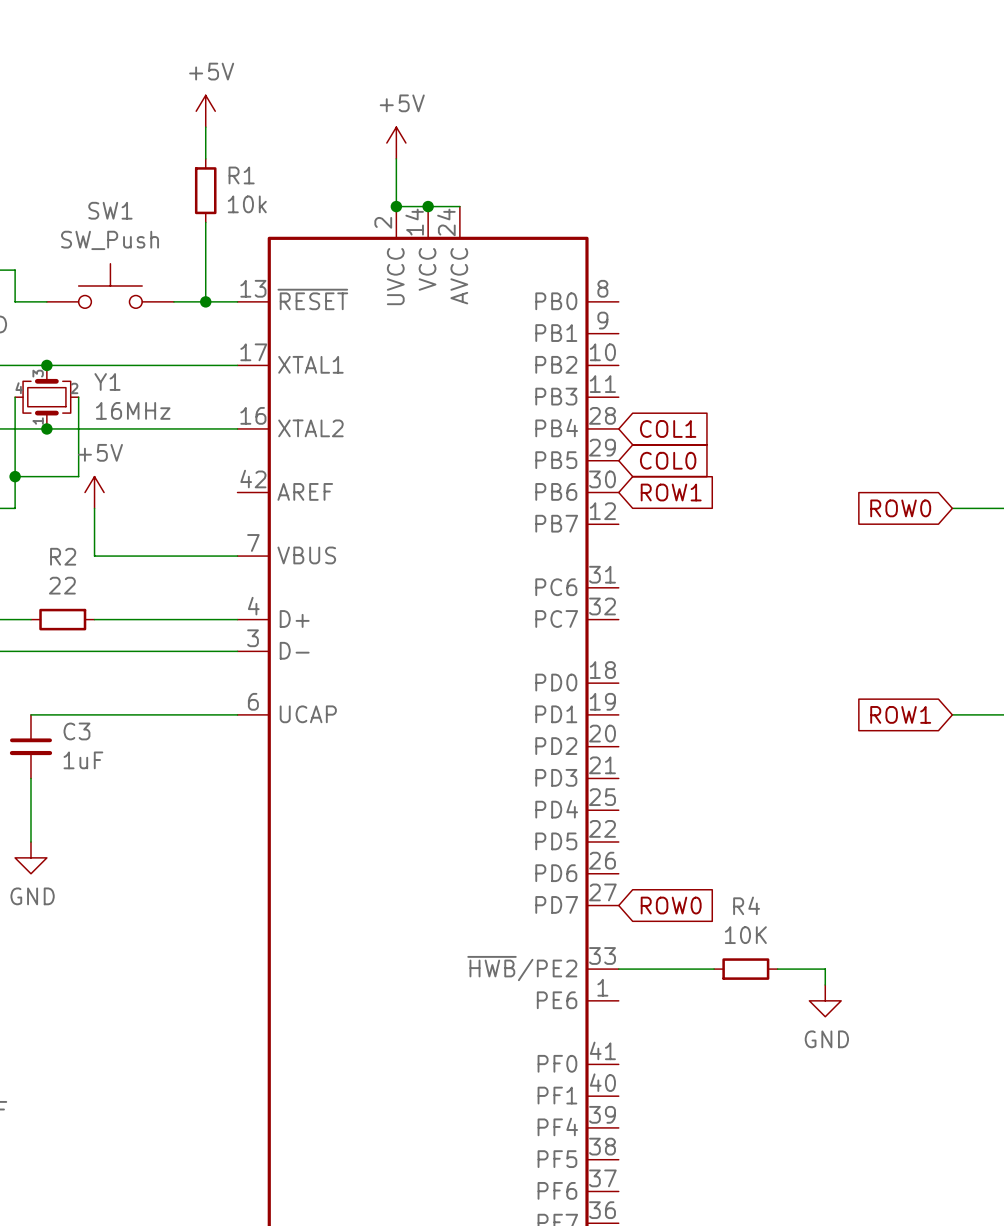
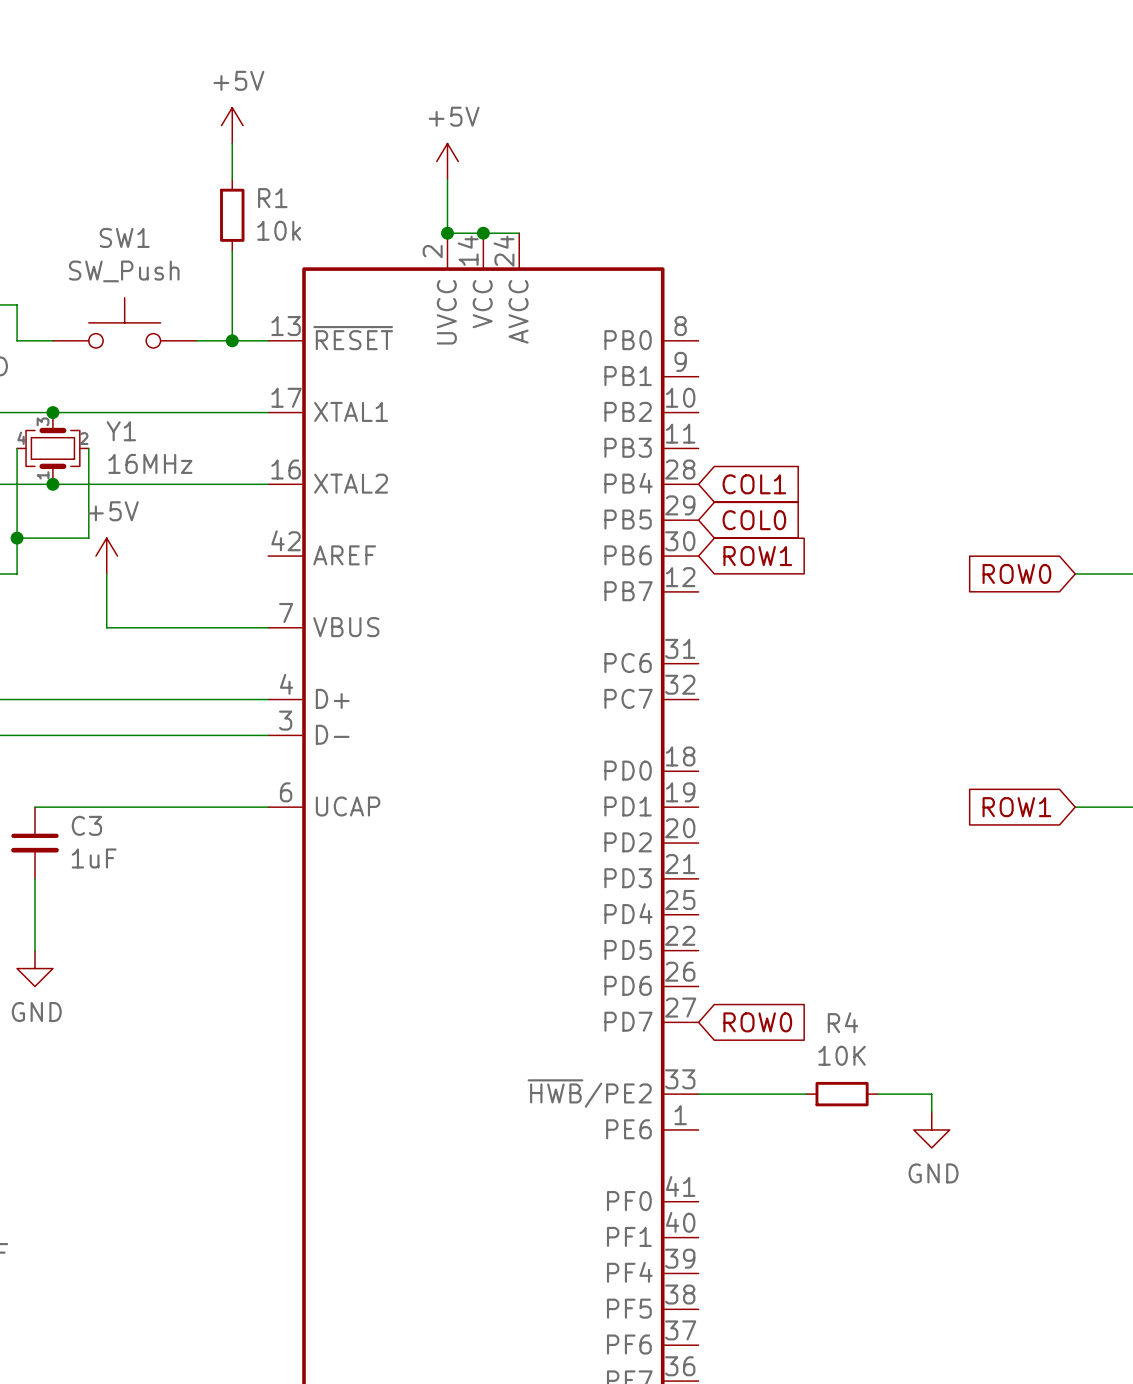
wire: none -> (34, 699) (106, 699)
R2: 22 (62, 619) -> none

